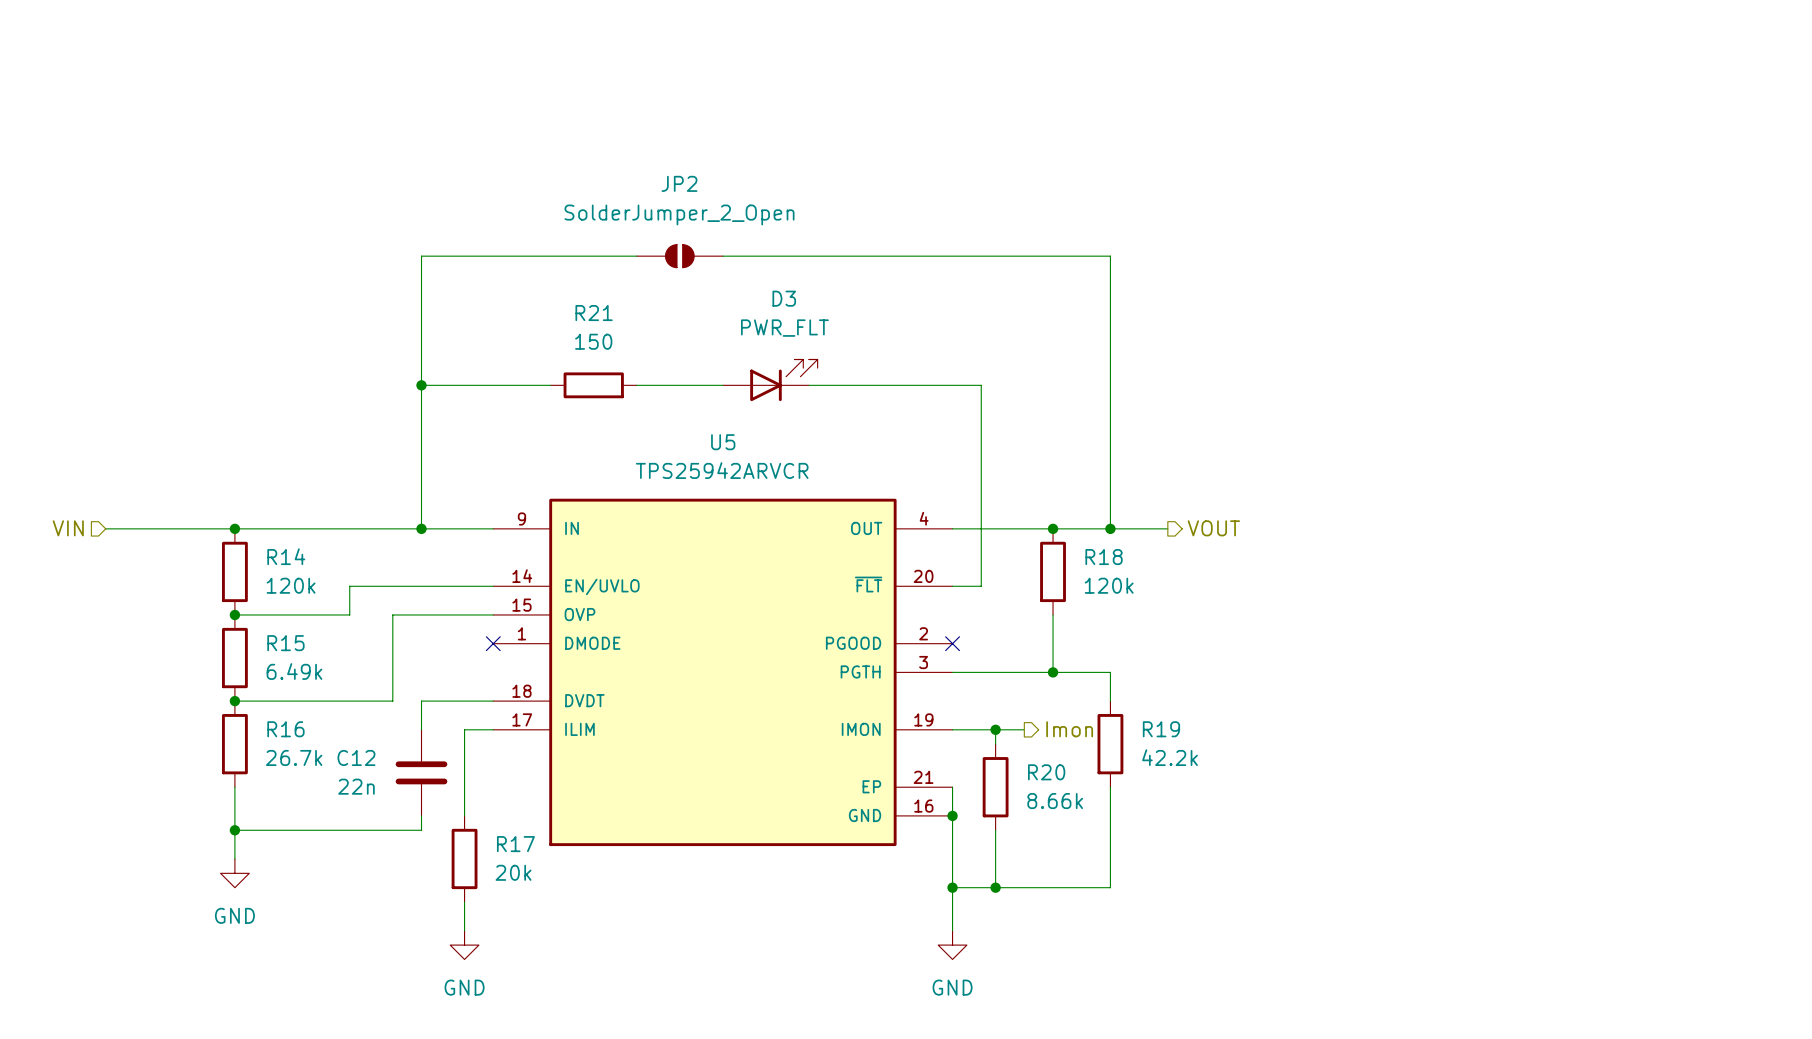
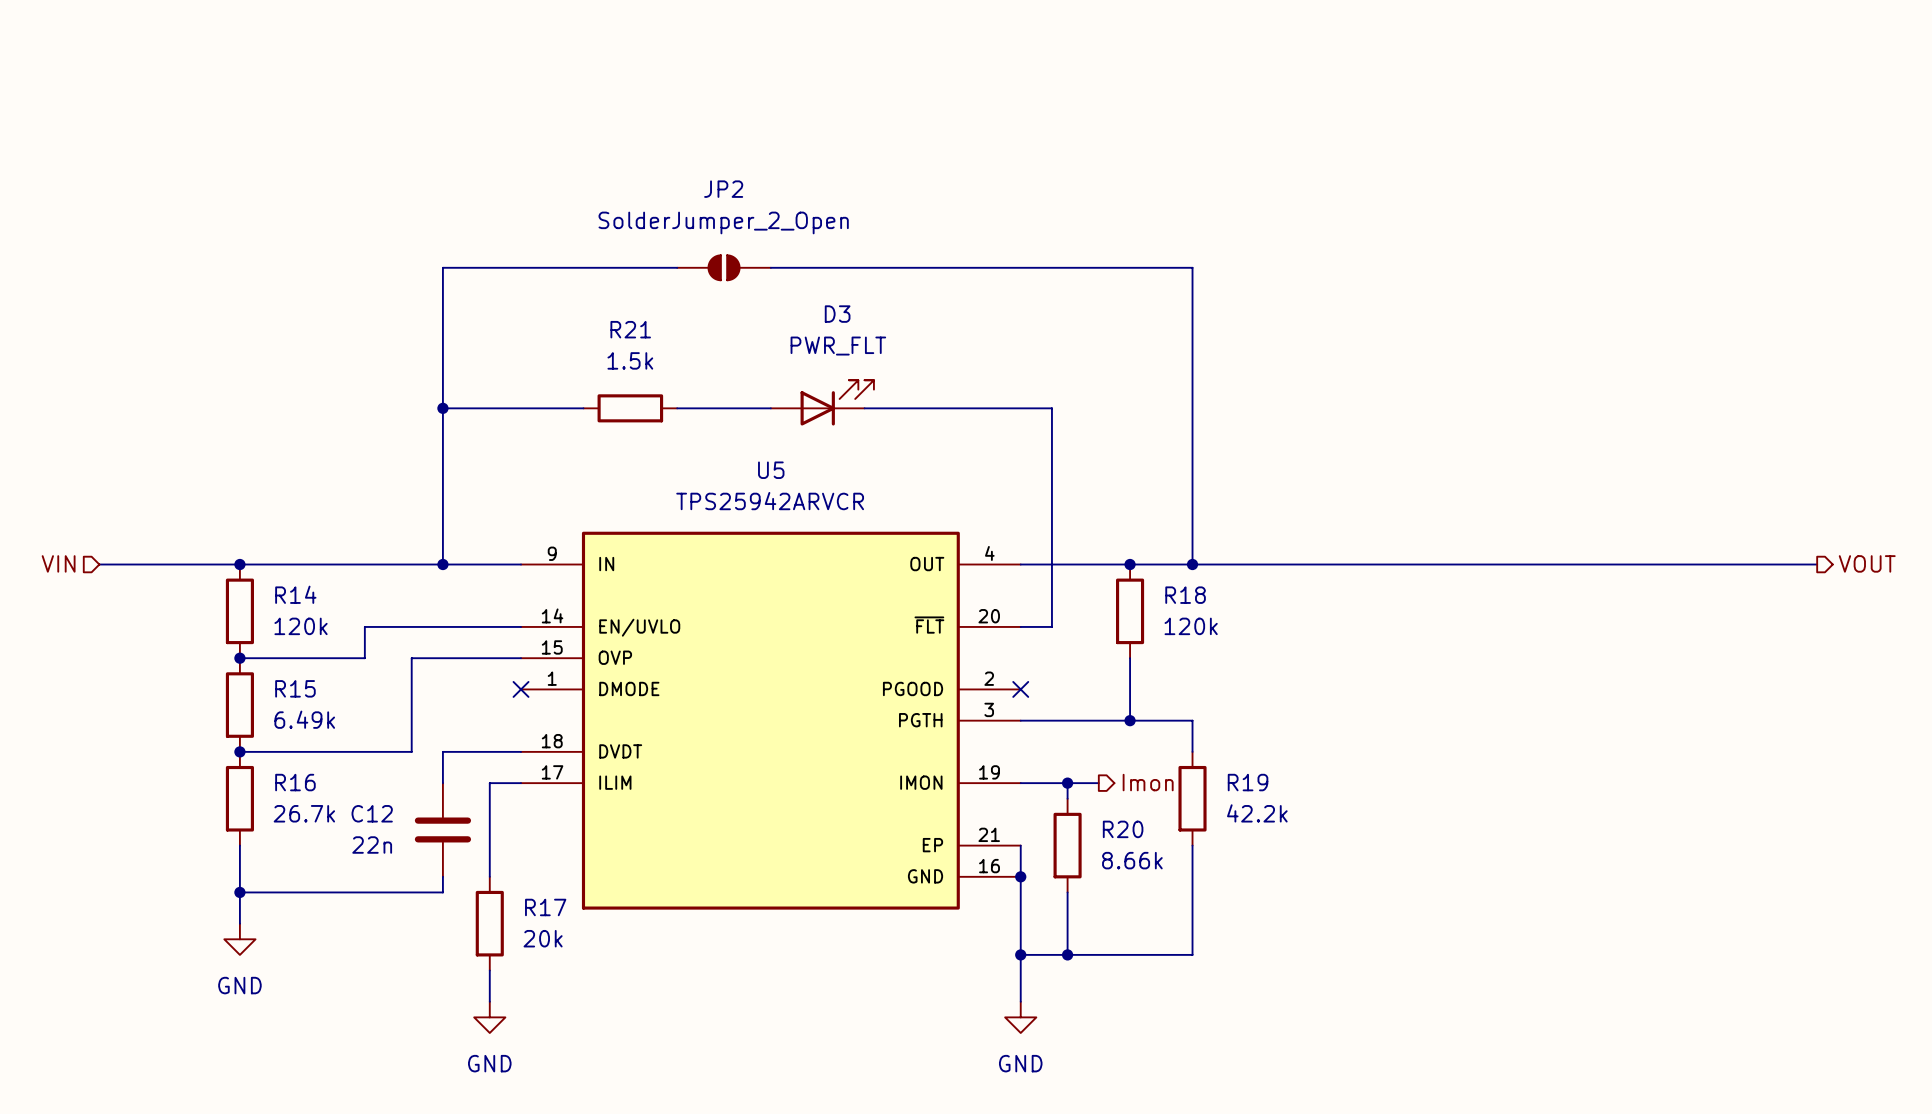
R21 value: 150 (593, 341) -> 1.5k (630, 360)
wire: none -> (1254, 564) (1817, 564)
hierarchical label: VOUT (1213, 528) -> none
hierarchical label: none -> VOUT (1867, 563)

